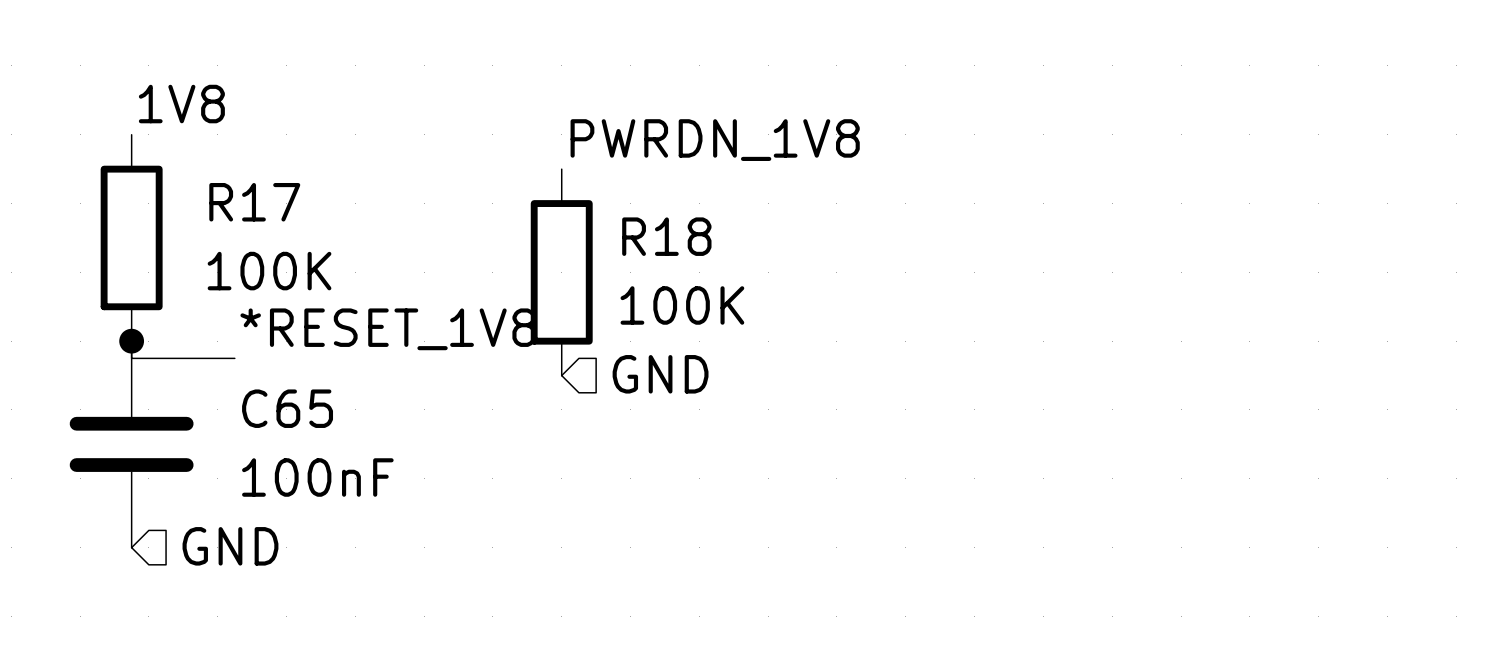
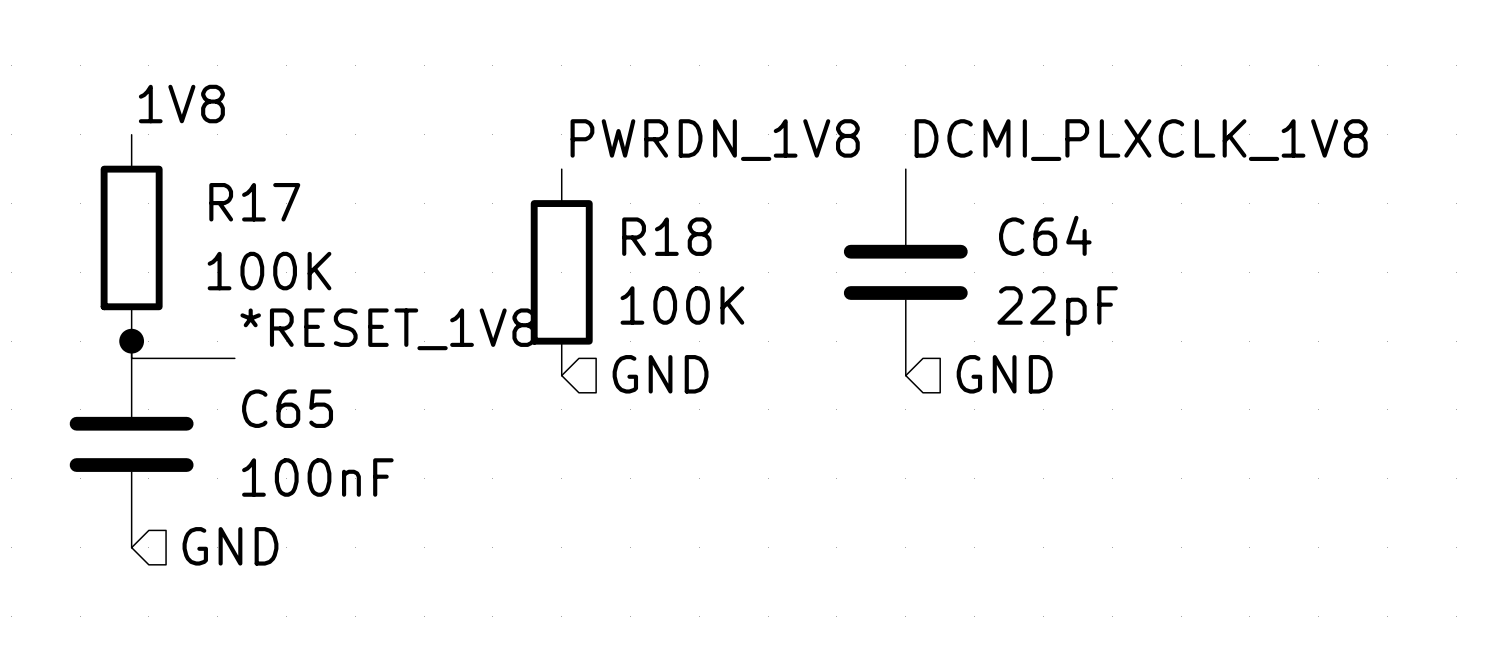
label: none -> DCMI_PLXCLK_1V8 (1141, 140)
C64: none -> 22pF (905, 272)
hierarchical label: none -> GND (1004, 374)

